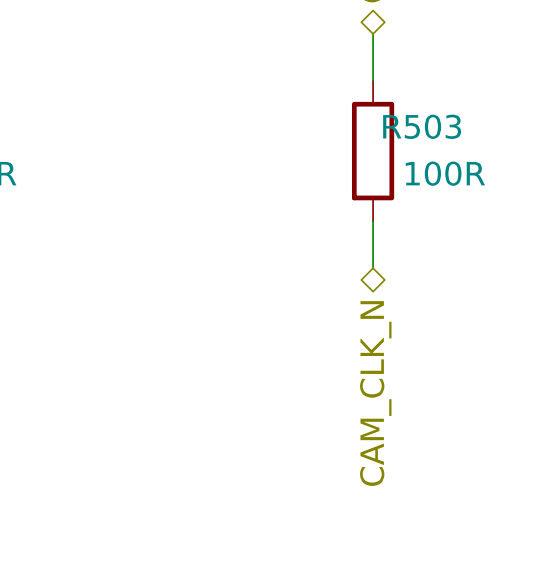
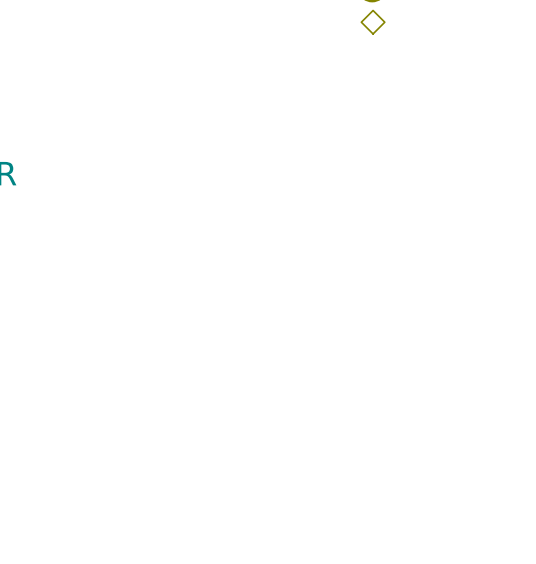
wire: (373, 33) (373, 80) -> none
R503: 100R (373, 151) -> none
wire: (373, 221) (373, 268) -> none
hierarchical label: CAM_CLK_N (375, 393) -> none

